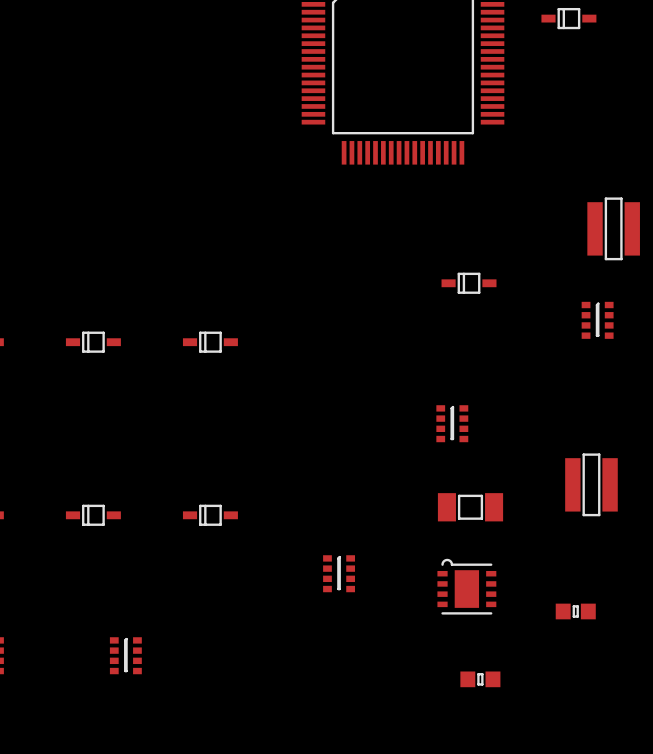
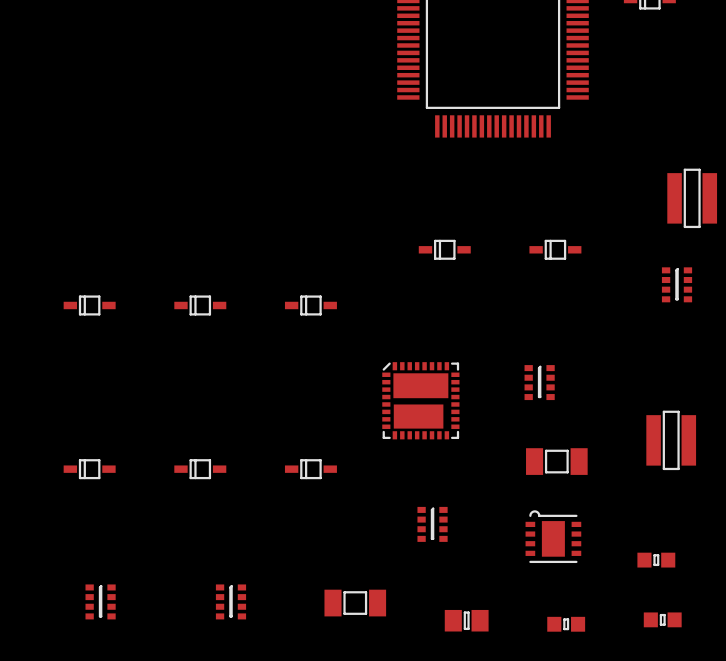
part: none -> (444, 249)
part: none -> (420, 400)
part: none -> (355, 603)
part: none -> (662, 619)
part: none -> (466, 620)

